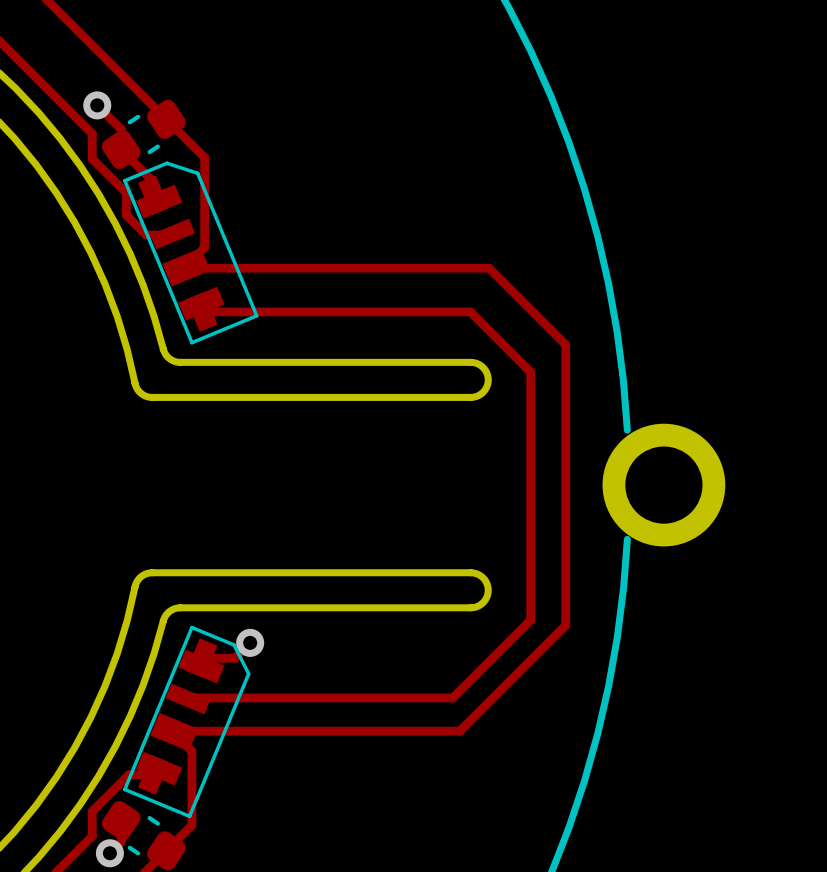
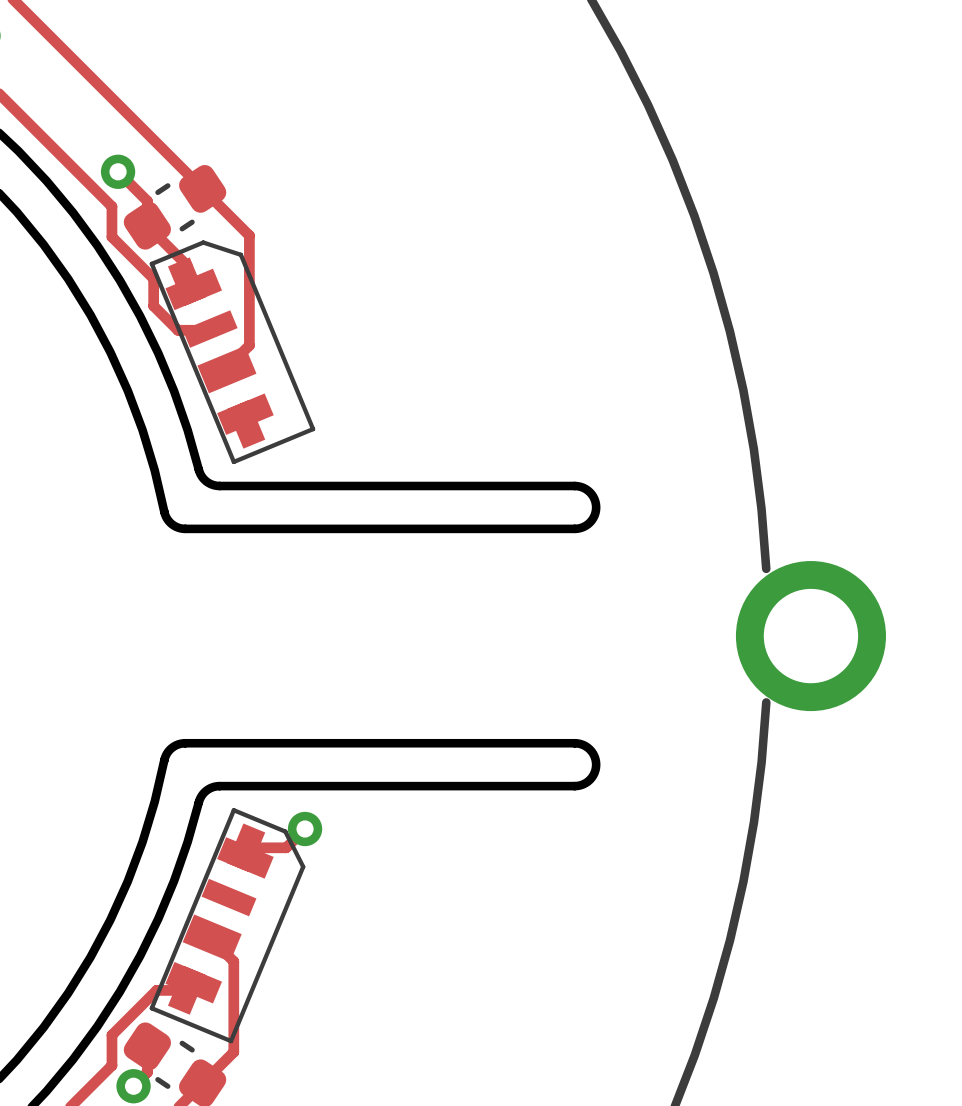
track: (183, 268) (489, 268) (565, 344) (565, 625) (459, 731) (171, 731) -> none
track: (201, 311) (470, 311) (530, 372) (530, 620) (452, 697) (185, 697) -> none

